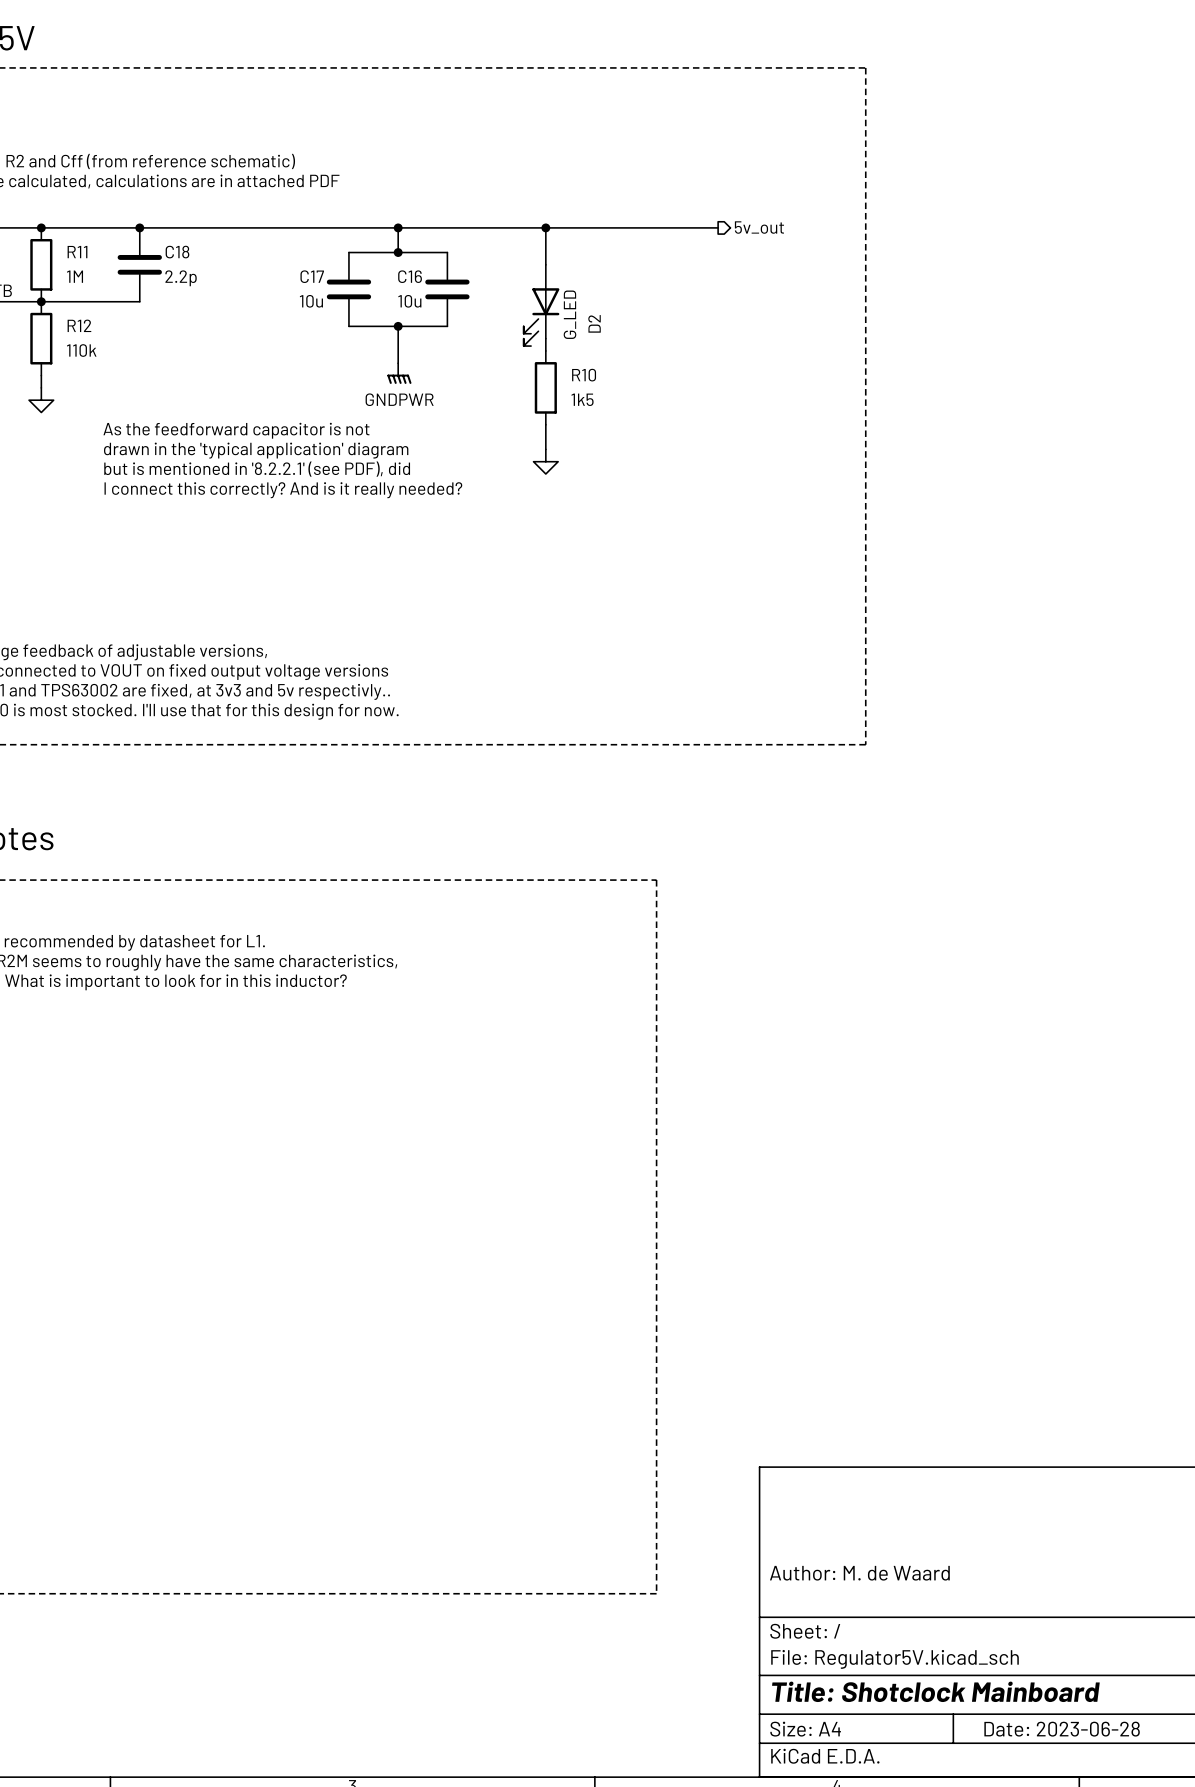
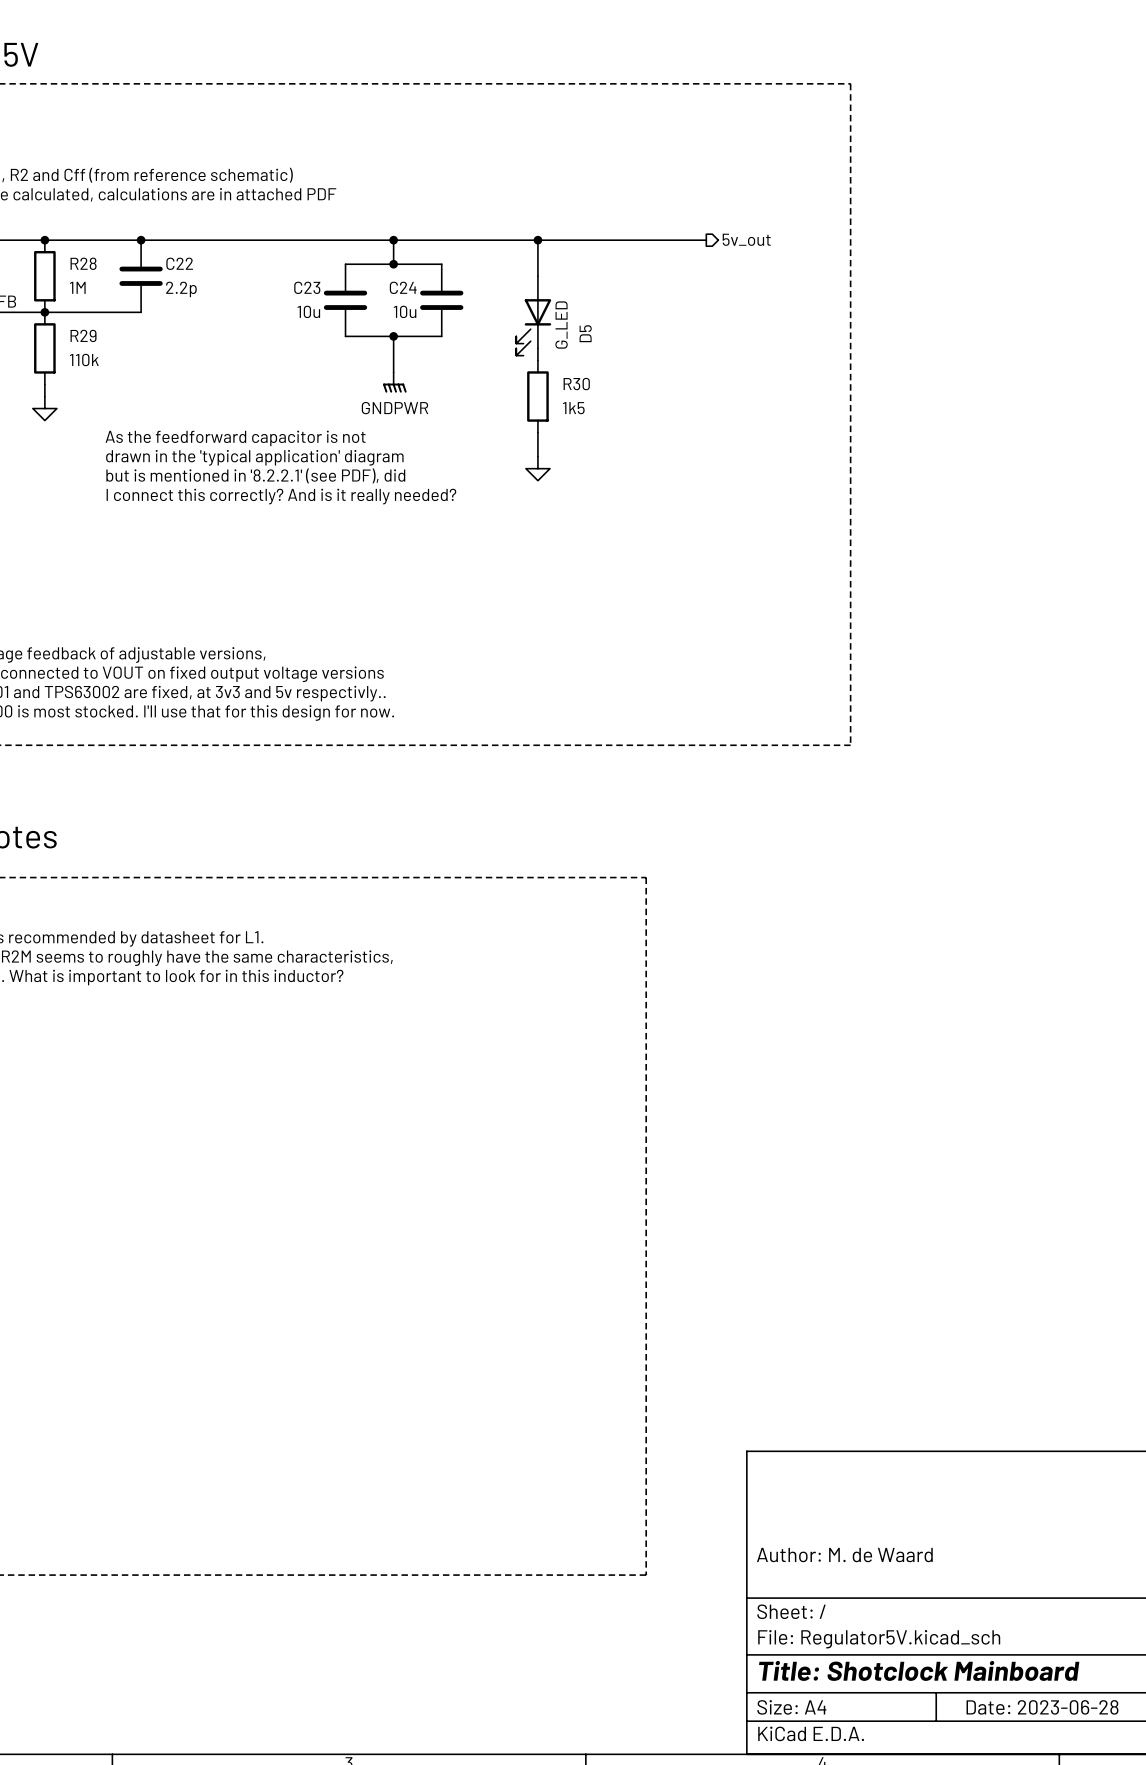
R11 name: R11 (77, 252) -> R28 (83, 263)
C18 name: C18 (177, 252) -> C22 (179, 263)
C17 name: C17 (312, 276) -> C23 (307, 287)
C16 name: C16 (410, 276) -> C24 (403, 287)
D2 name: D2 (594, 323) -> D5 (585, 333)
R12 name: R12 (79, 325) -> R29 (83, 335)
R10 name: R10 (584, 375) -> R30 (576, 384)

